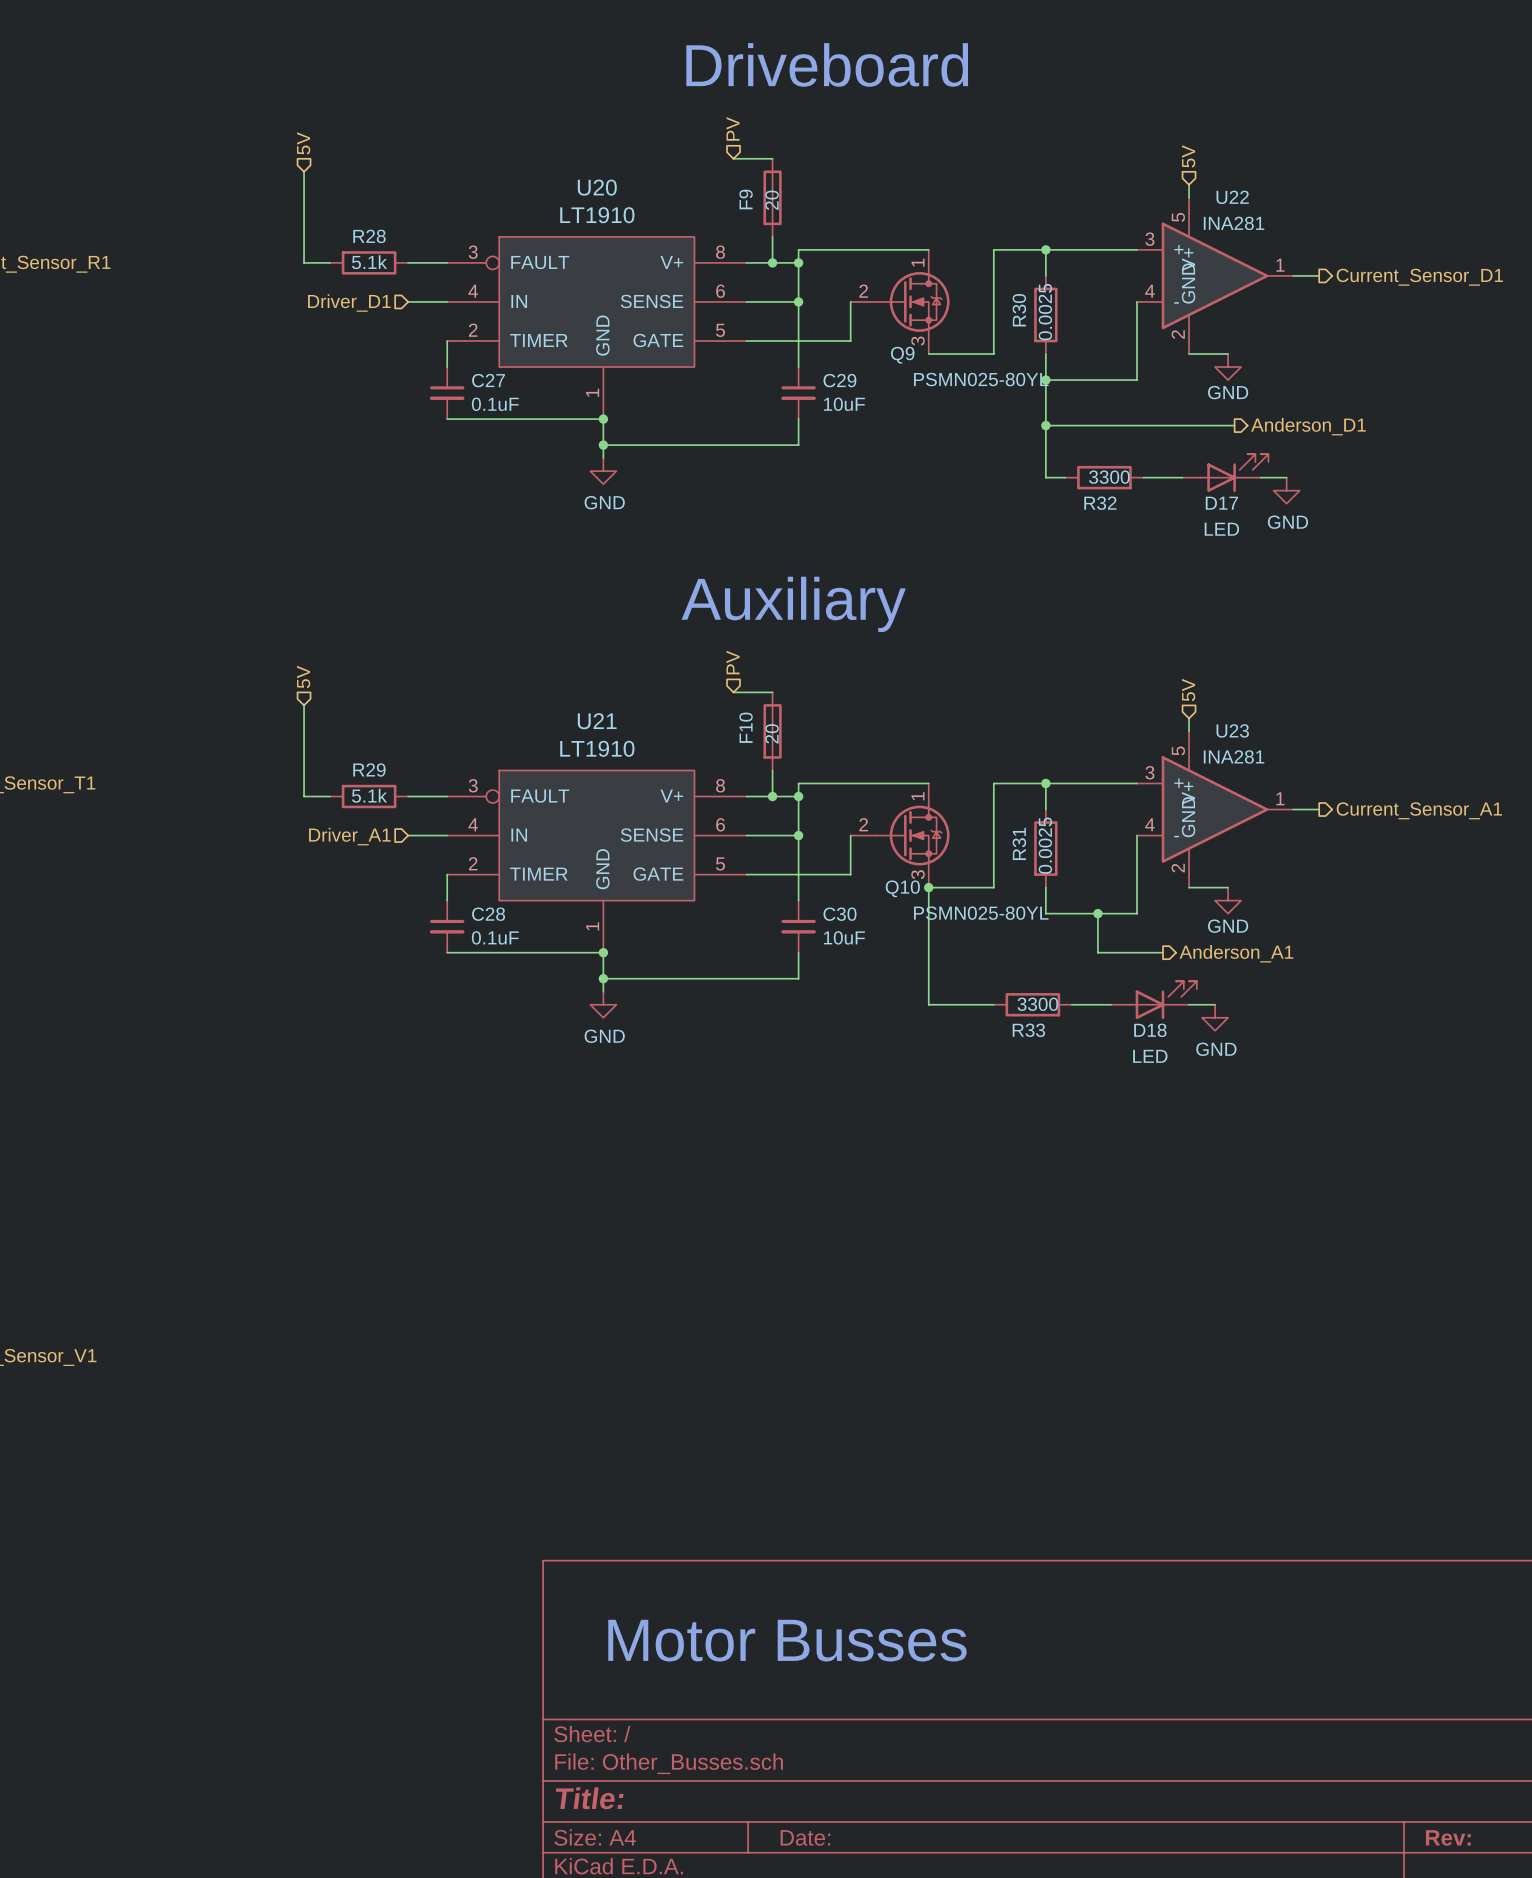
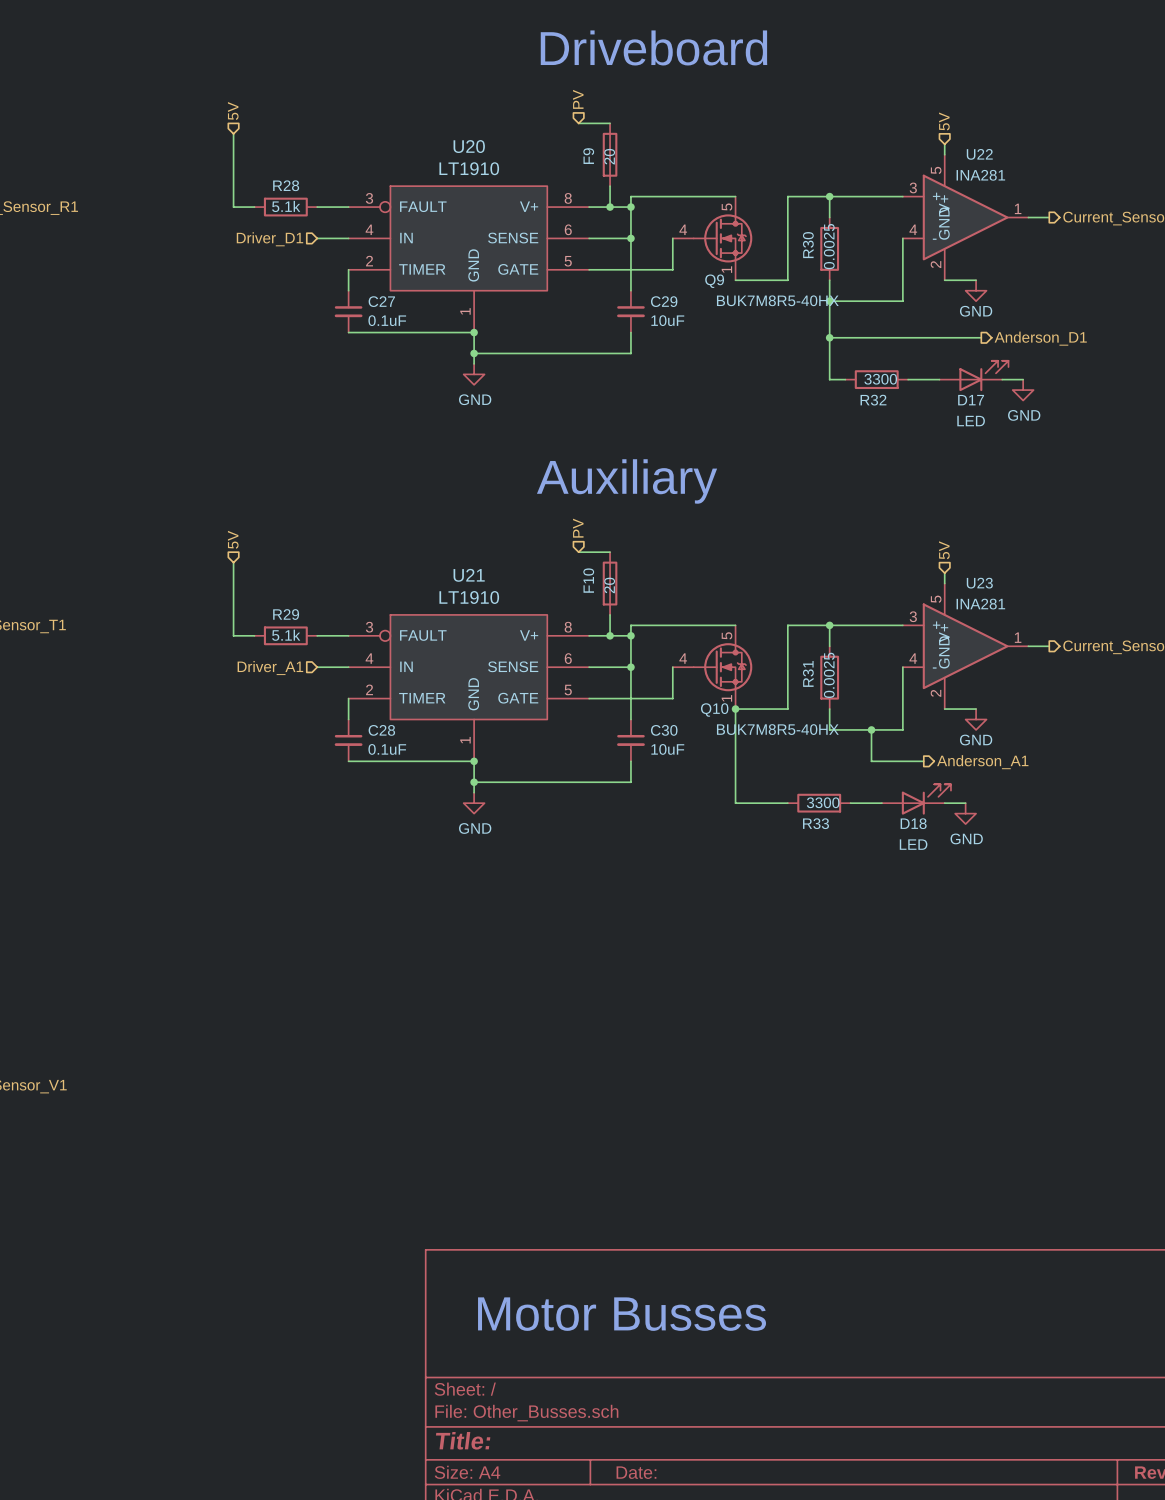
Q9 pin number: 1 (918, 262) -> 5 (726, 207)
Q9 pin number: 2 (863, 291) -> 4 (683, 229)
Q9 pin number: 3 (918, 341) -> 1 (726, 269)
Q9 value: PSMN025-80YL (981, 379) -> BUK7M8R5-40HX (777, 300)
Q10 pin number: 1 (918, 796) -> 5 (726, 635)
Q10 pin number: 2 (863, 824) -> 4 (683, 658)
Q10 pin number: 3 (918, 874) -> 1 (726, 698)
Q10 value: PSMN025-80YL (981, 913) -> BUK7M8R5-40HX (777, 729)

